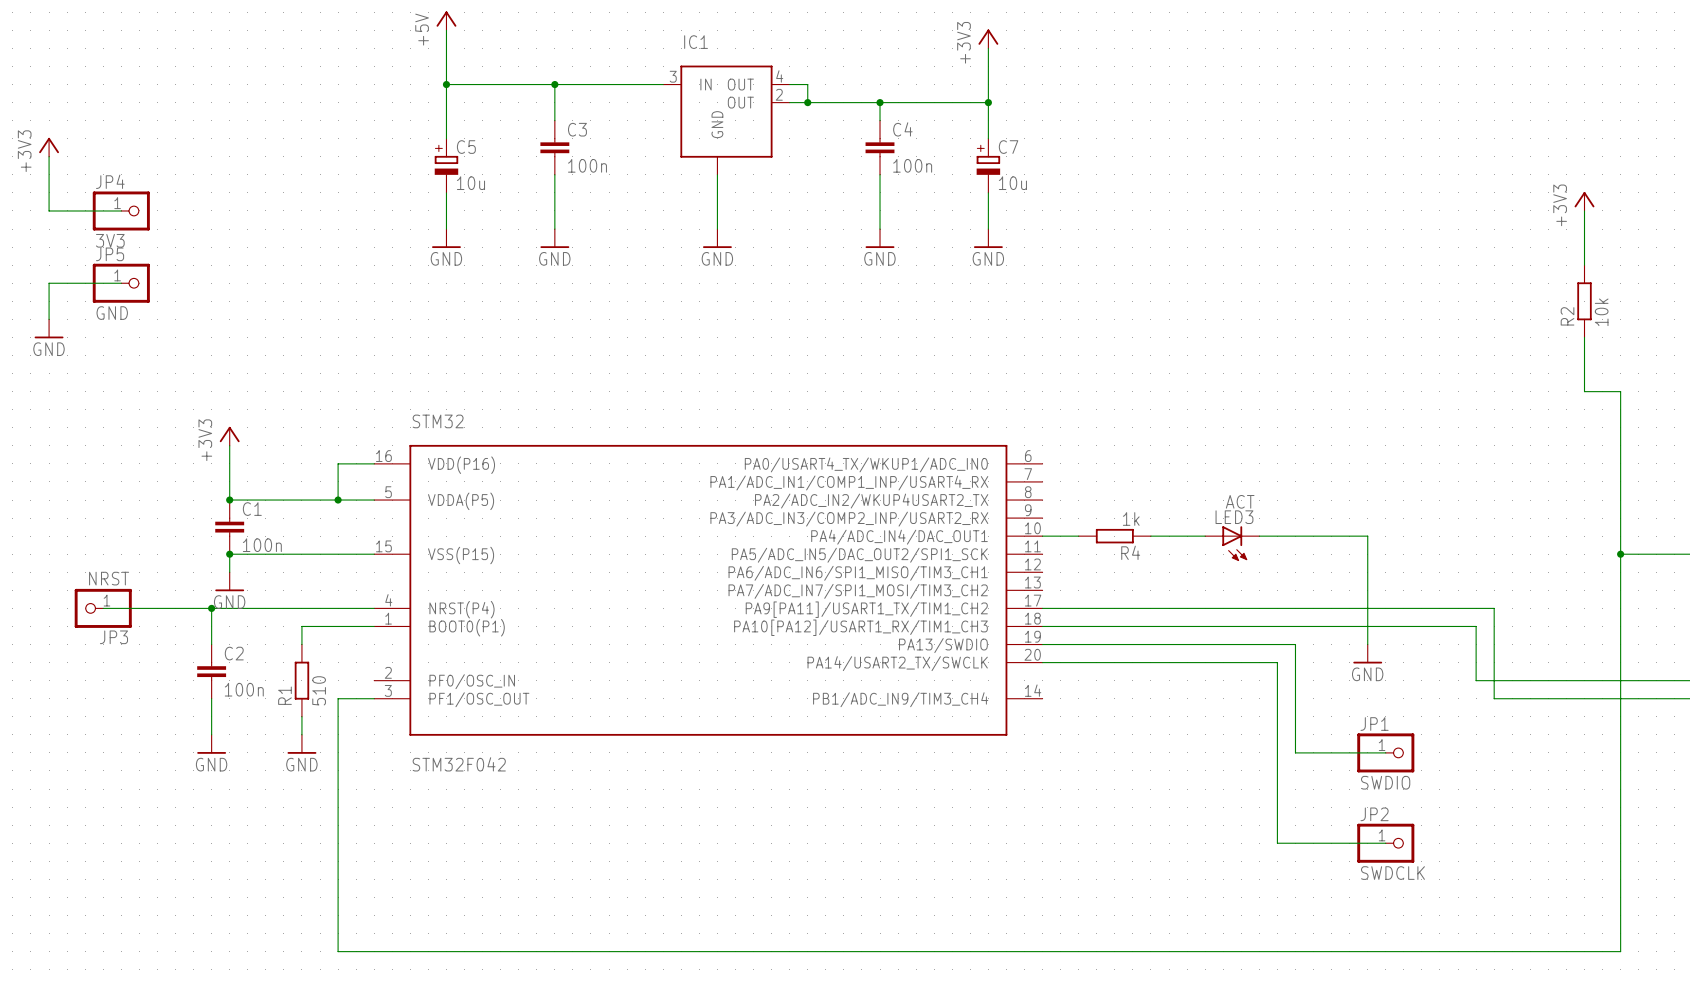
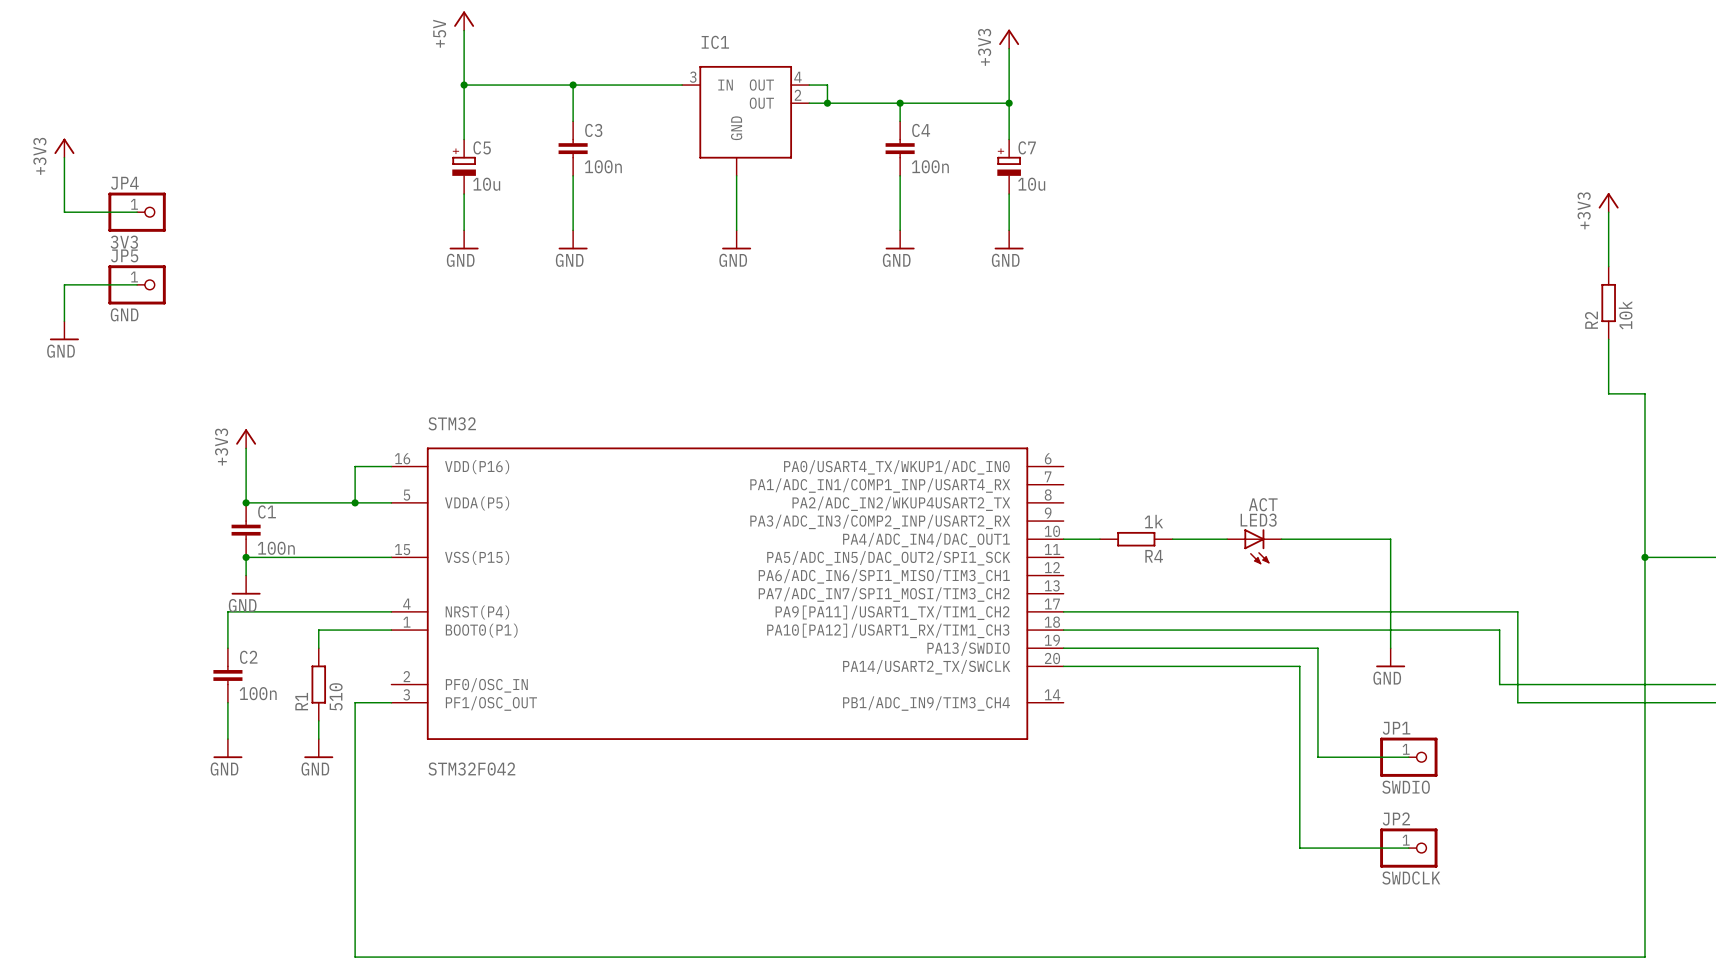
wire: (103, 608) (211, 608) -> none
JP3: NRST (103, 608) -> none
junction: (211, 608) -> none

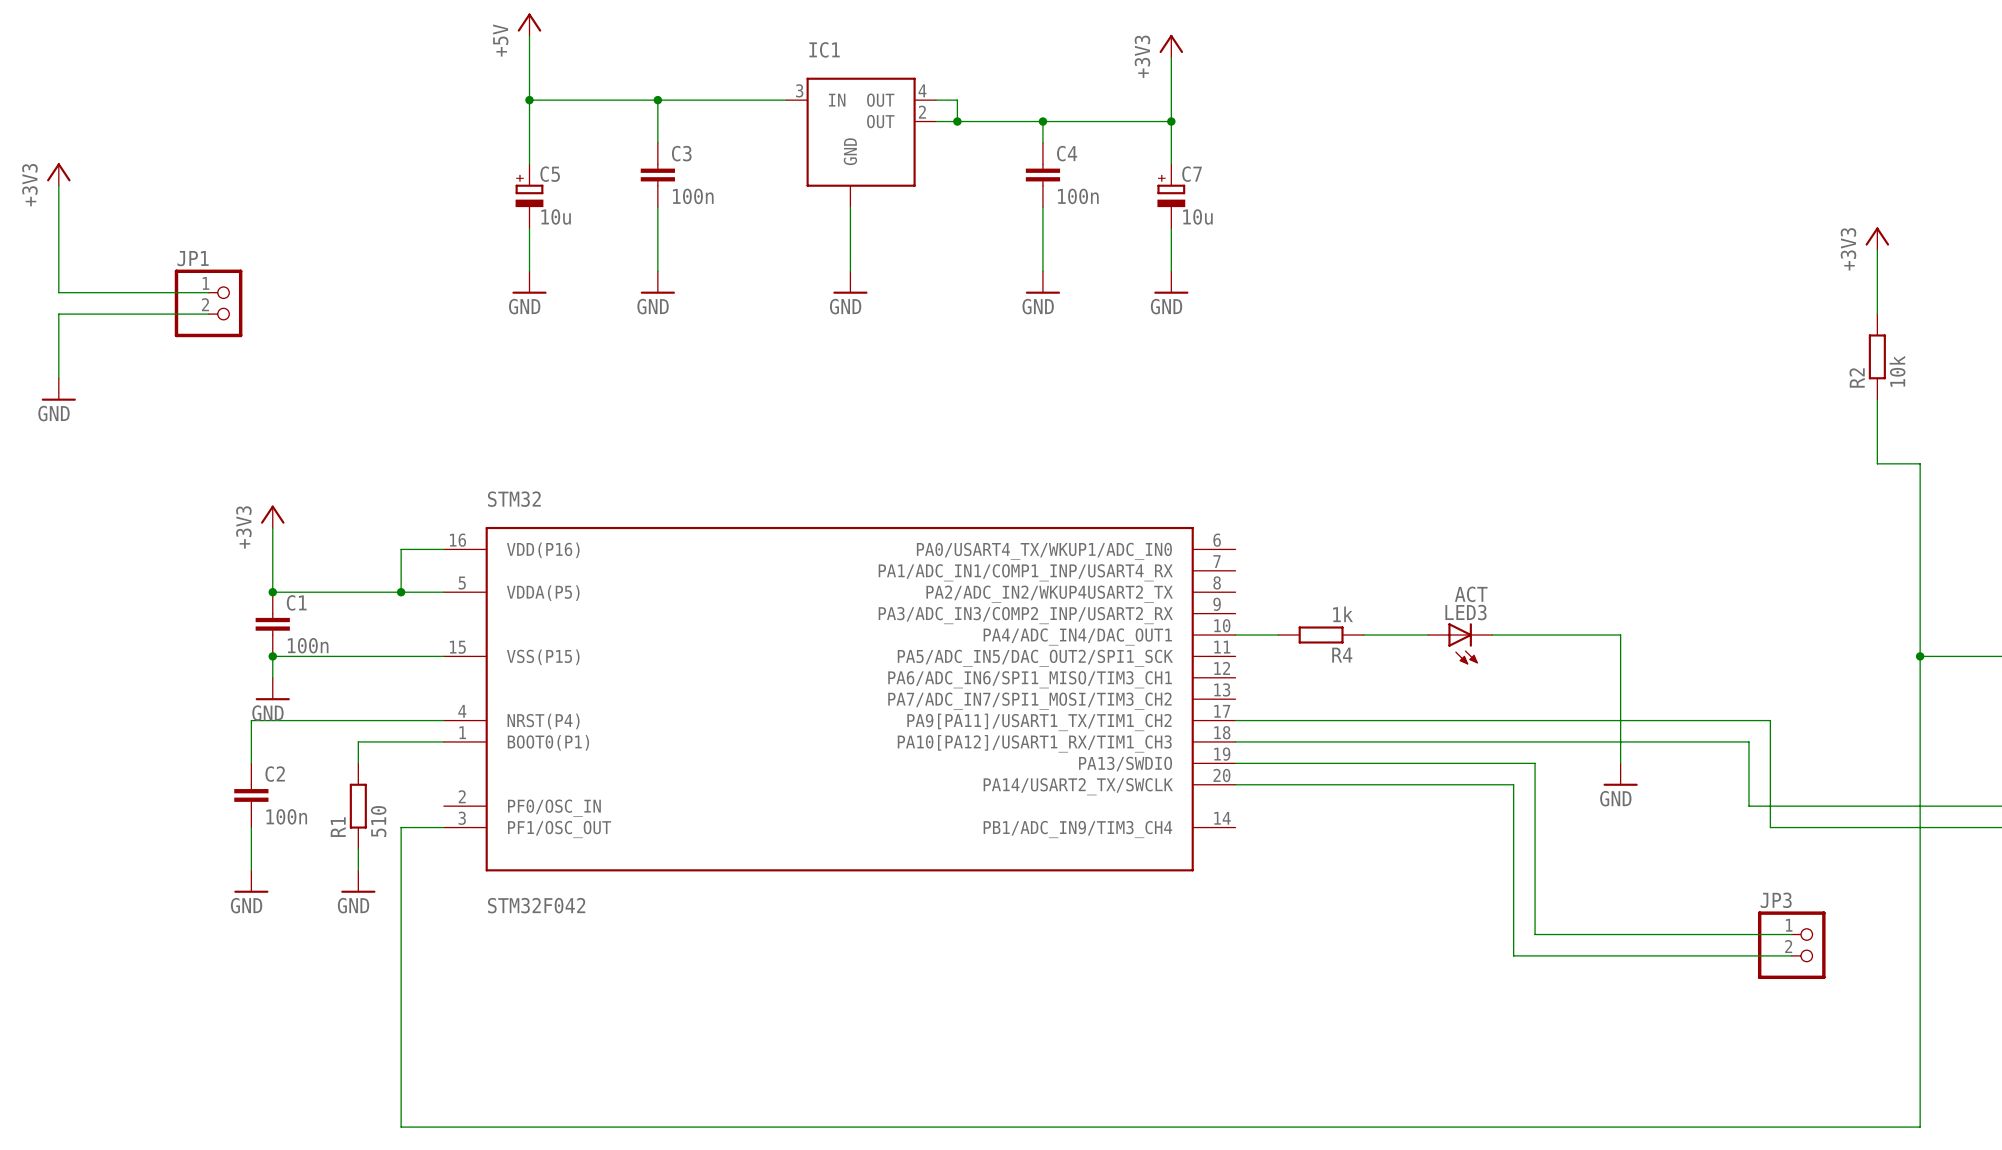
wire: (64, 212) (137, 212) -> (58, 249) (58, 292) (208, 292)
JP4: 3V3 (137, 212) -> none
wire: (64, 284) (137, 284) -> (58, 335) (58, 314) (208, 314)
JP5: GND (137, 284) -> none
JP1 symbol: [1380, 737, 1438, 777] -> [174, 269, 243, 338]
wire: (1317, 757) (1408, 757) -> (1535, 891) (1535, 934) (1791, 934)
JP1 value: SWDIO (1406, 787) -> none
JP3: none -> (1791, 945)
wire: (1299, 811) (1299, 848) (1408, 848) -> (1513, 955) (1791, 955)
JP2: SWDCLK (1408, 848) -> none

